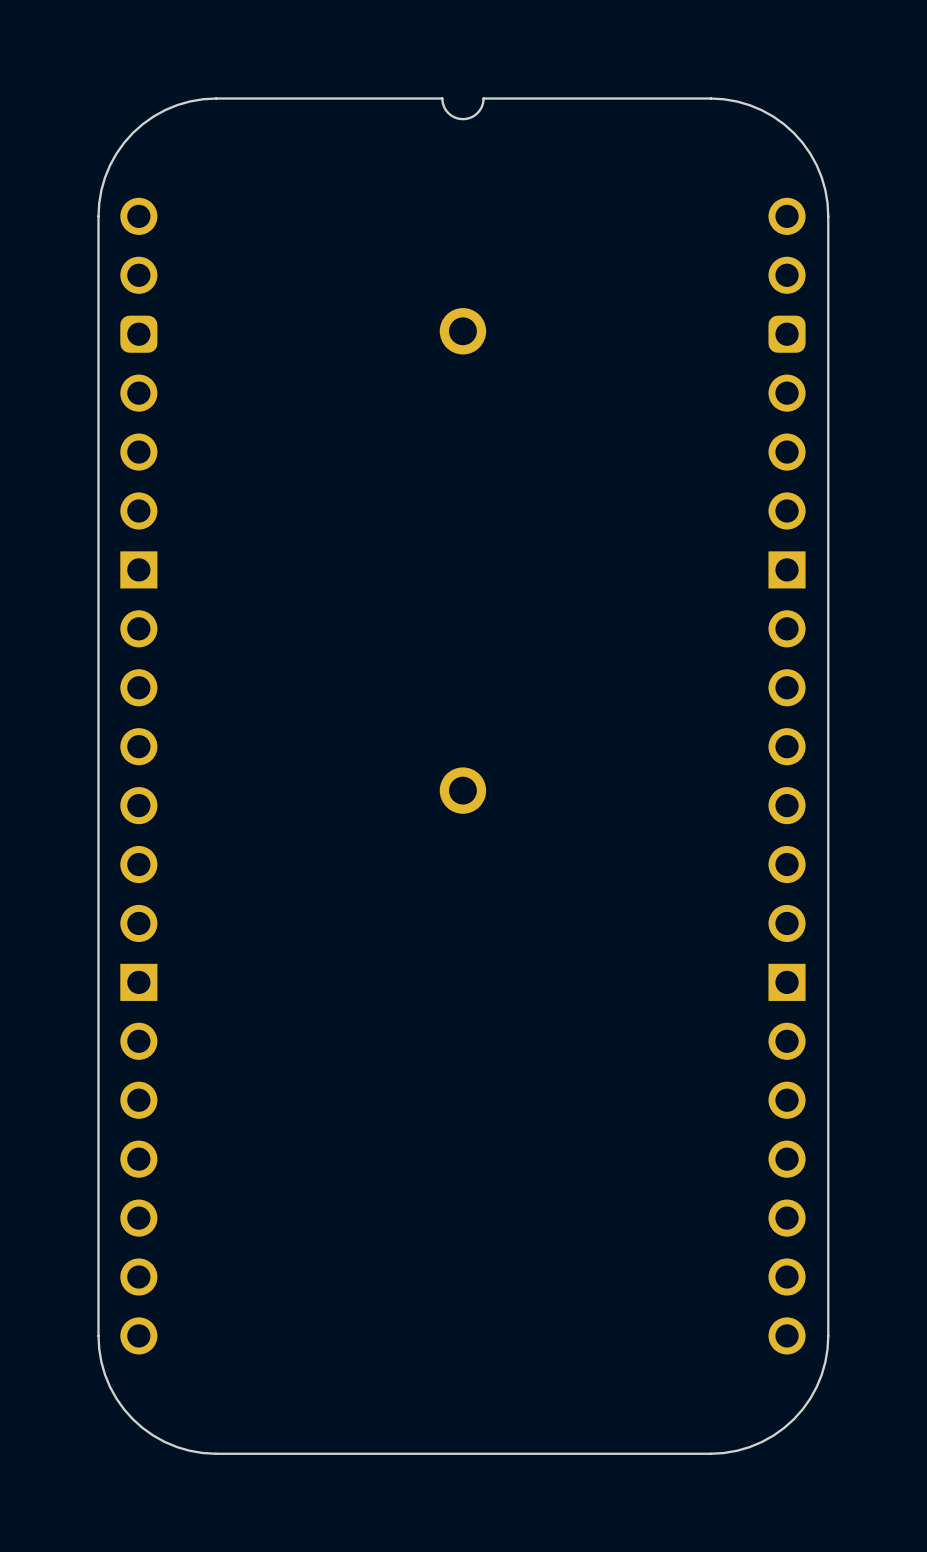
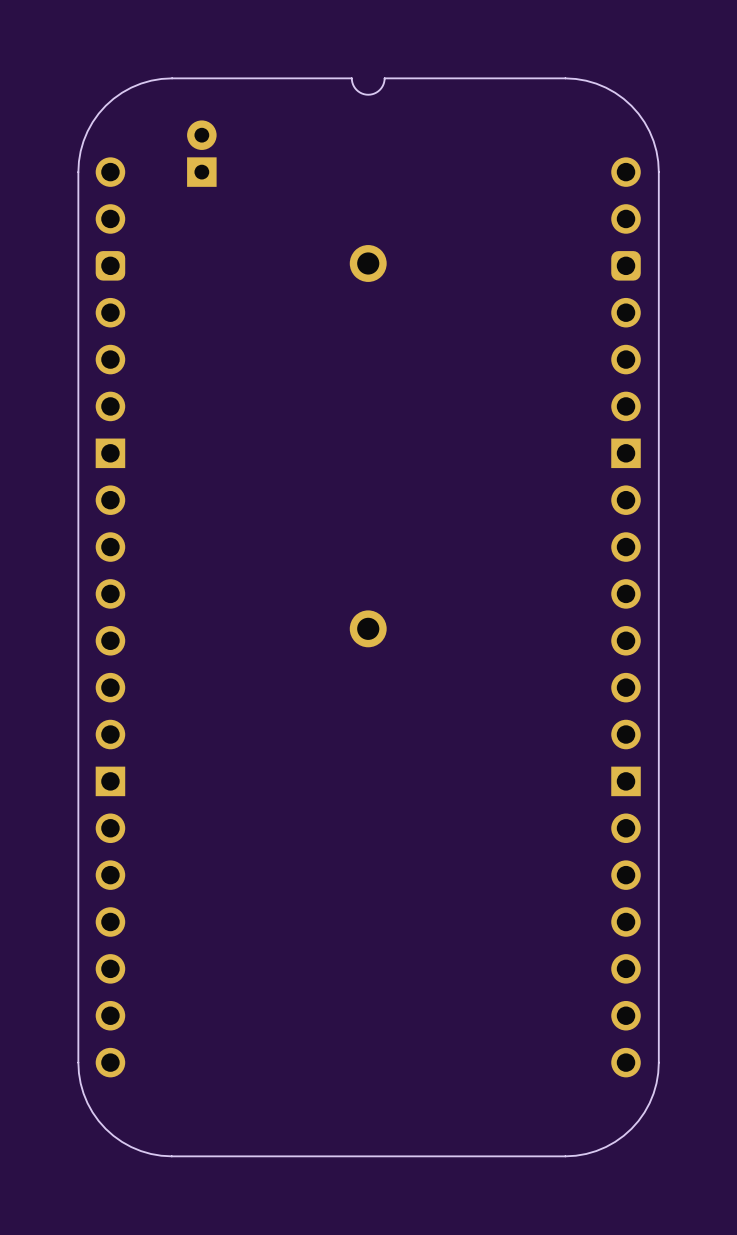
part: none -> (201, 153)

